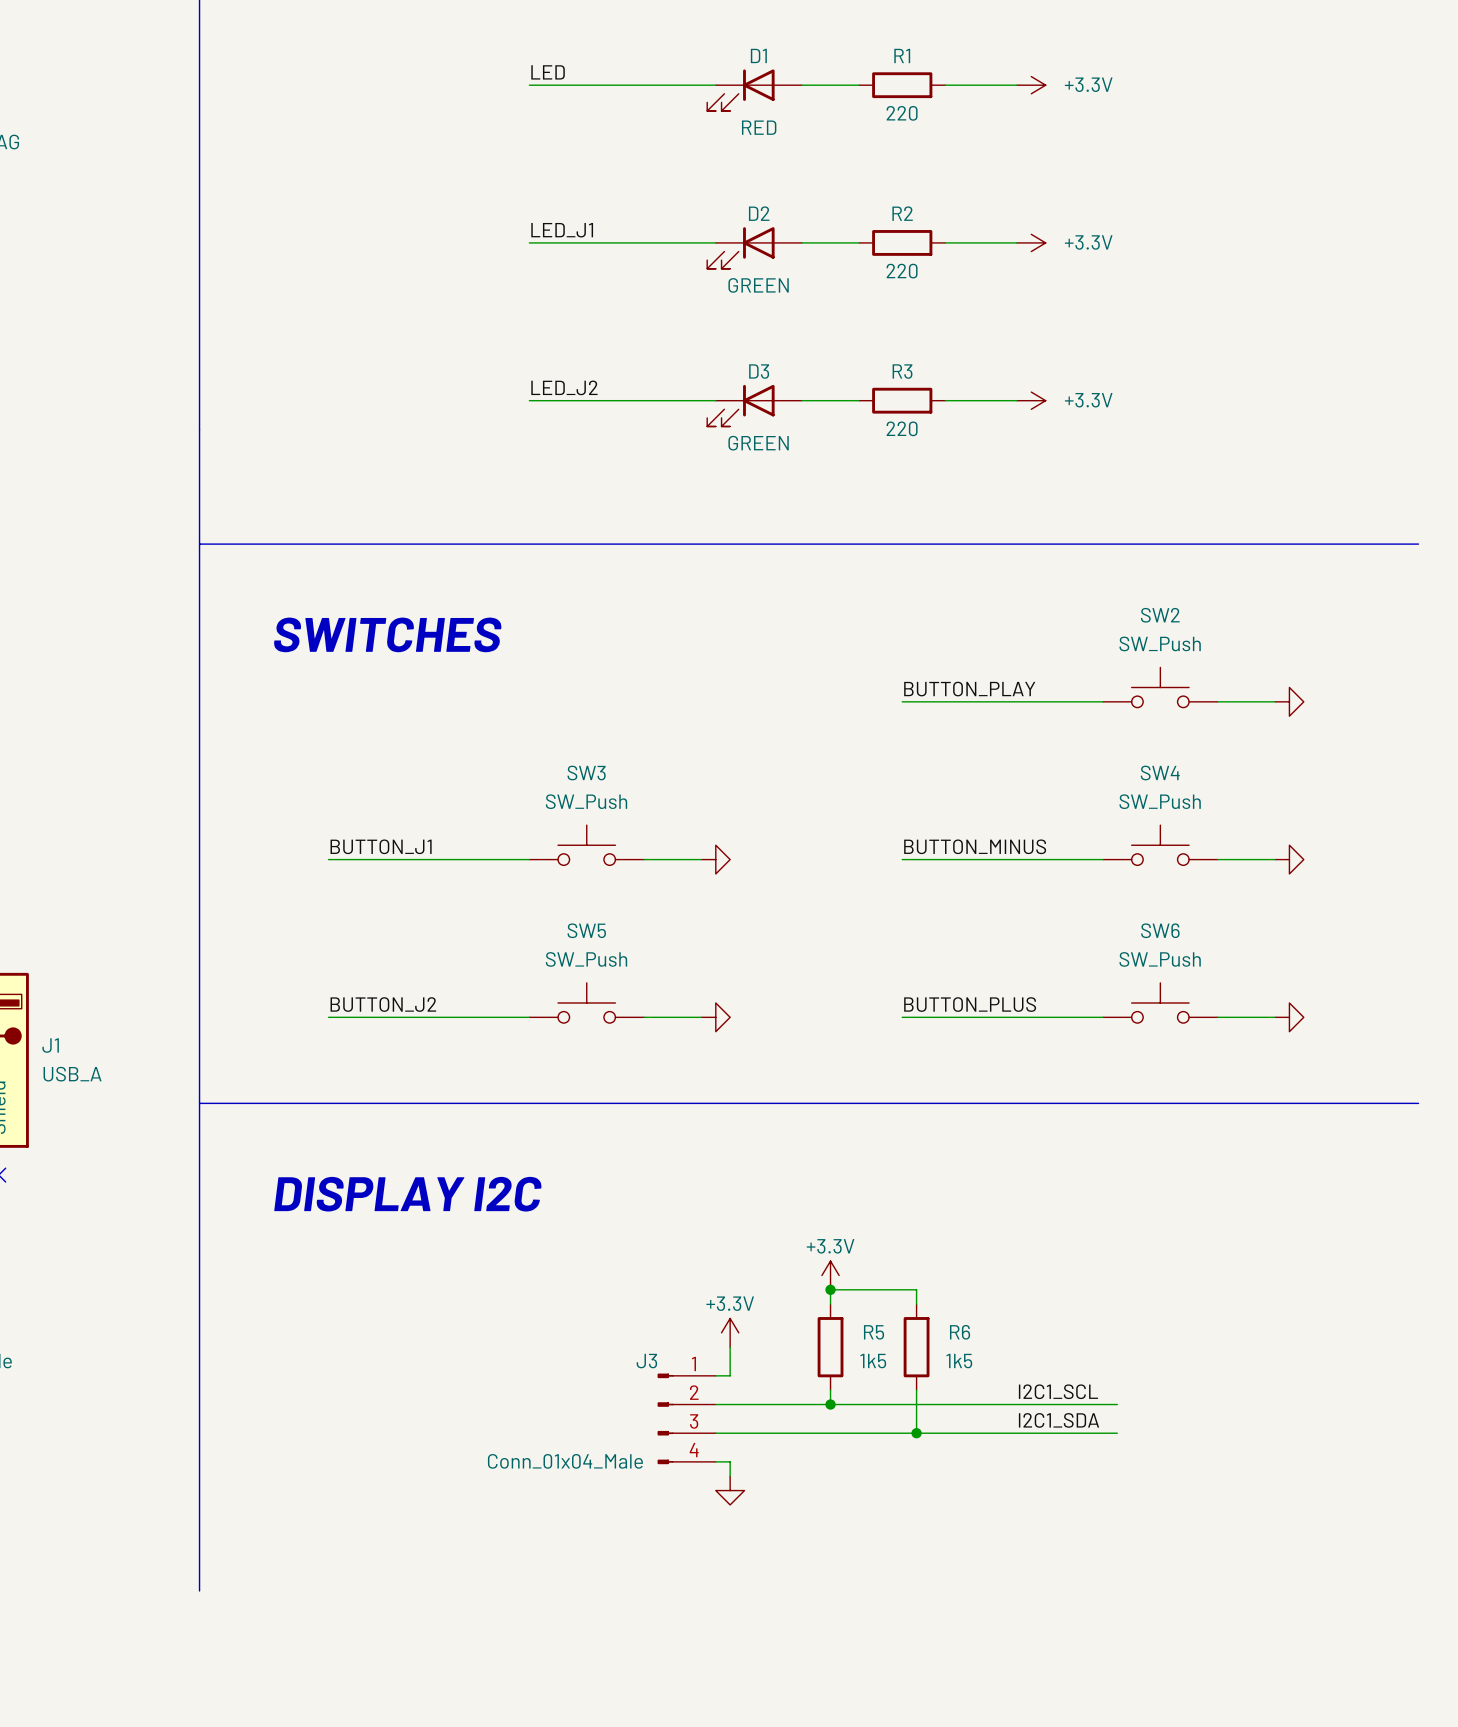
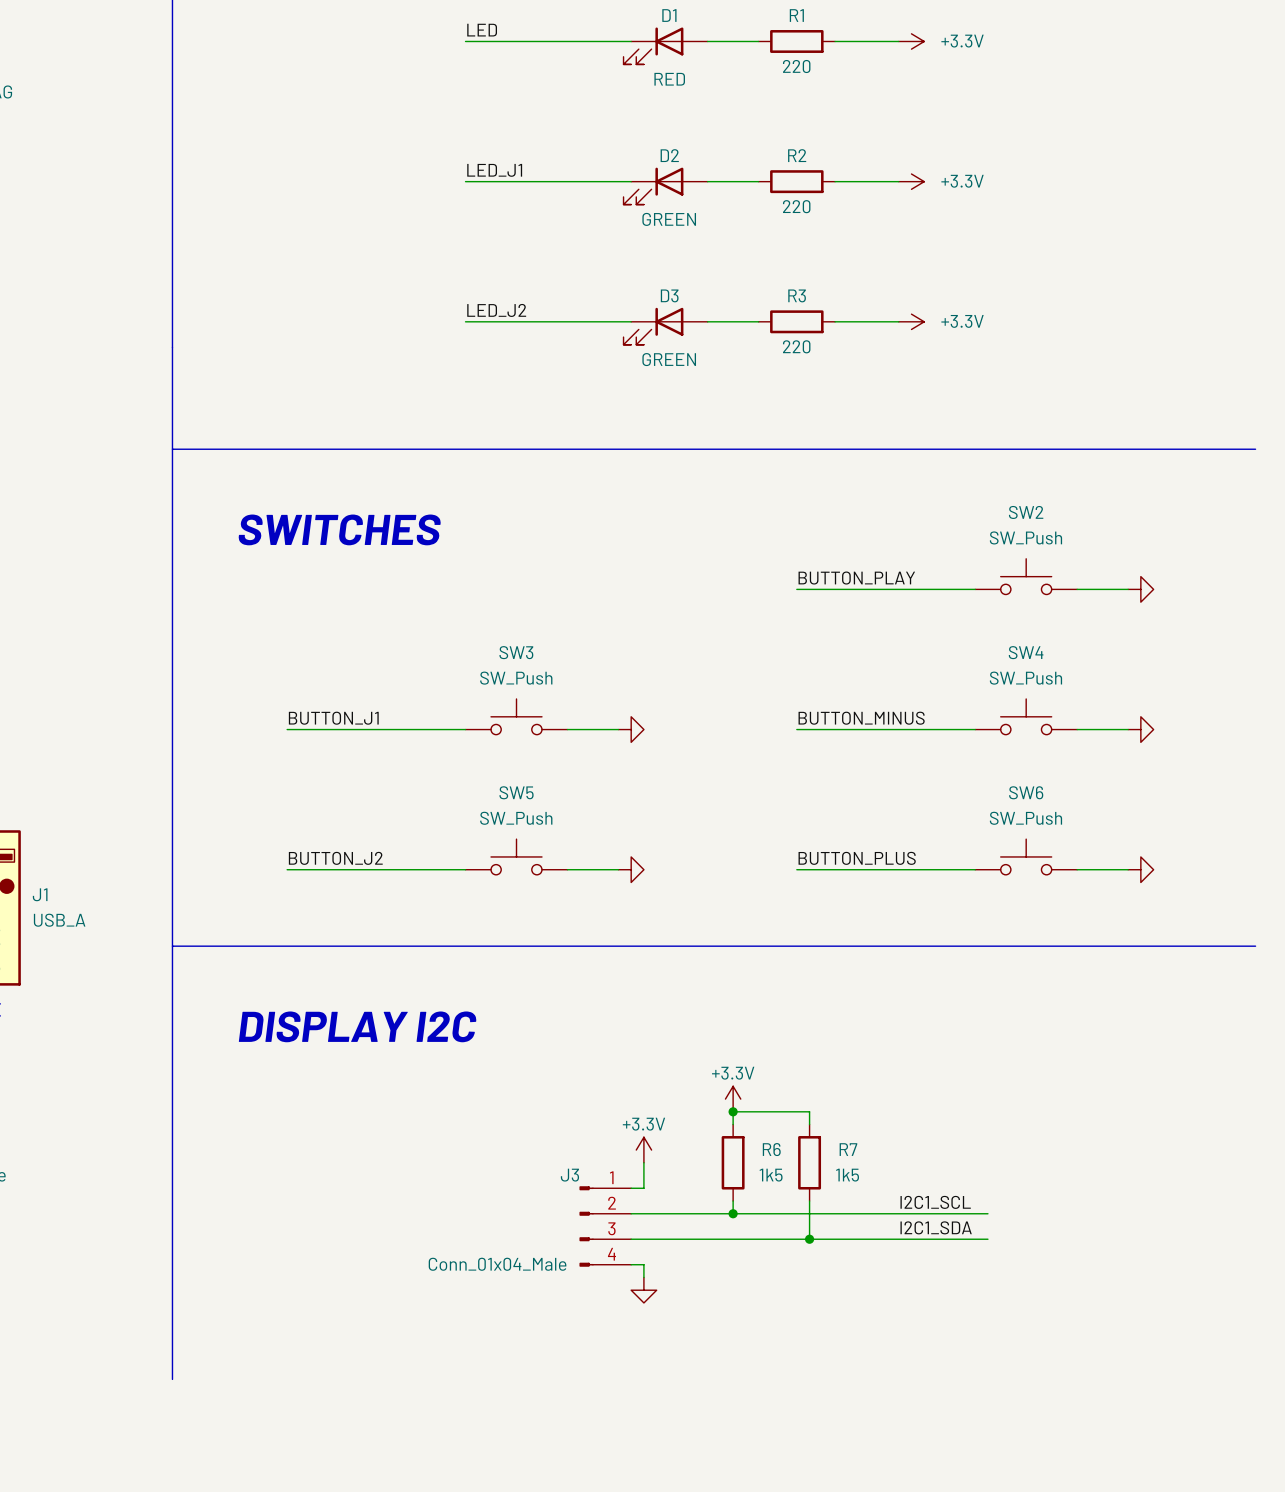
R5 name: R5 (874, 1332) -> R6 (771, 1149)
R6 name: R6 (960, 1332) -> R7 (848, 1149)

